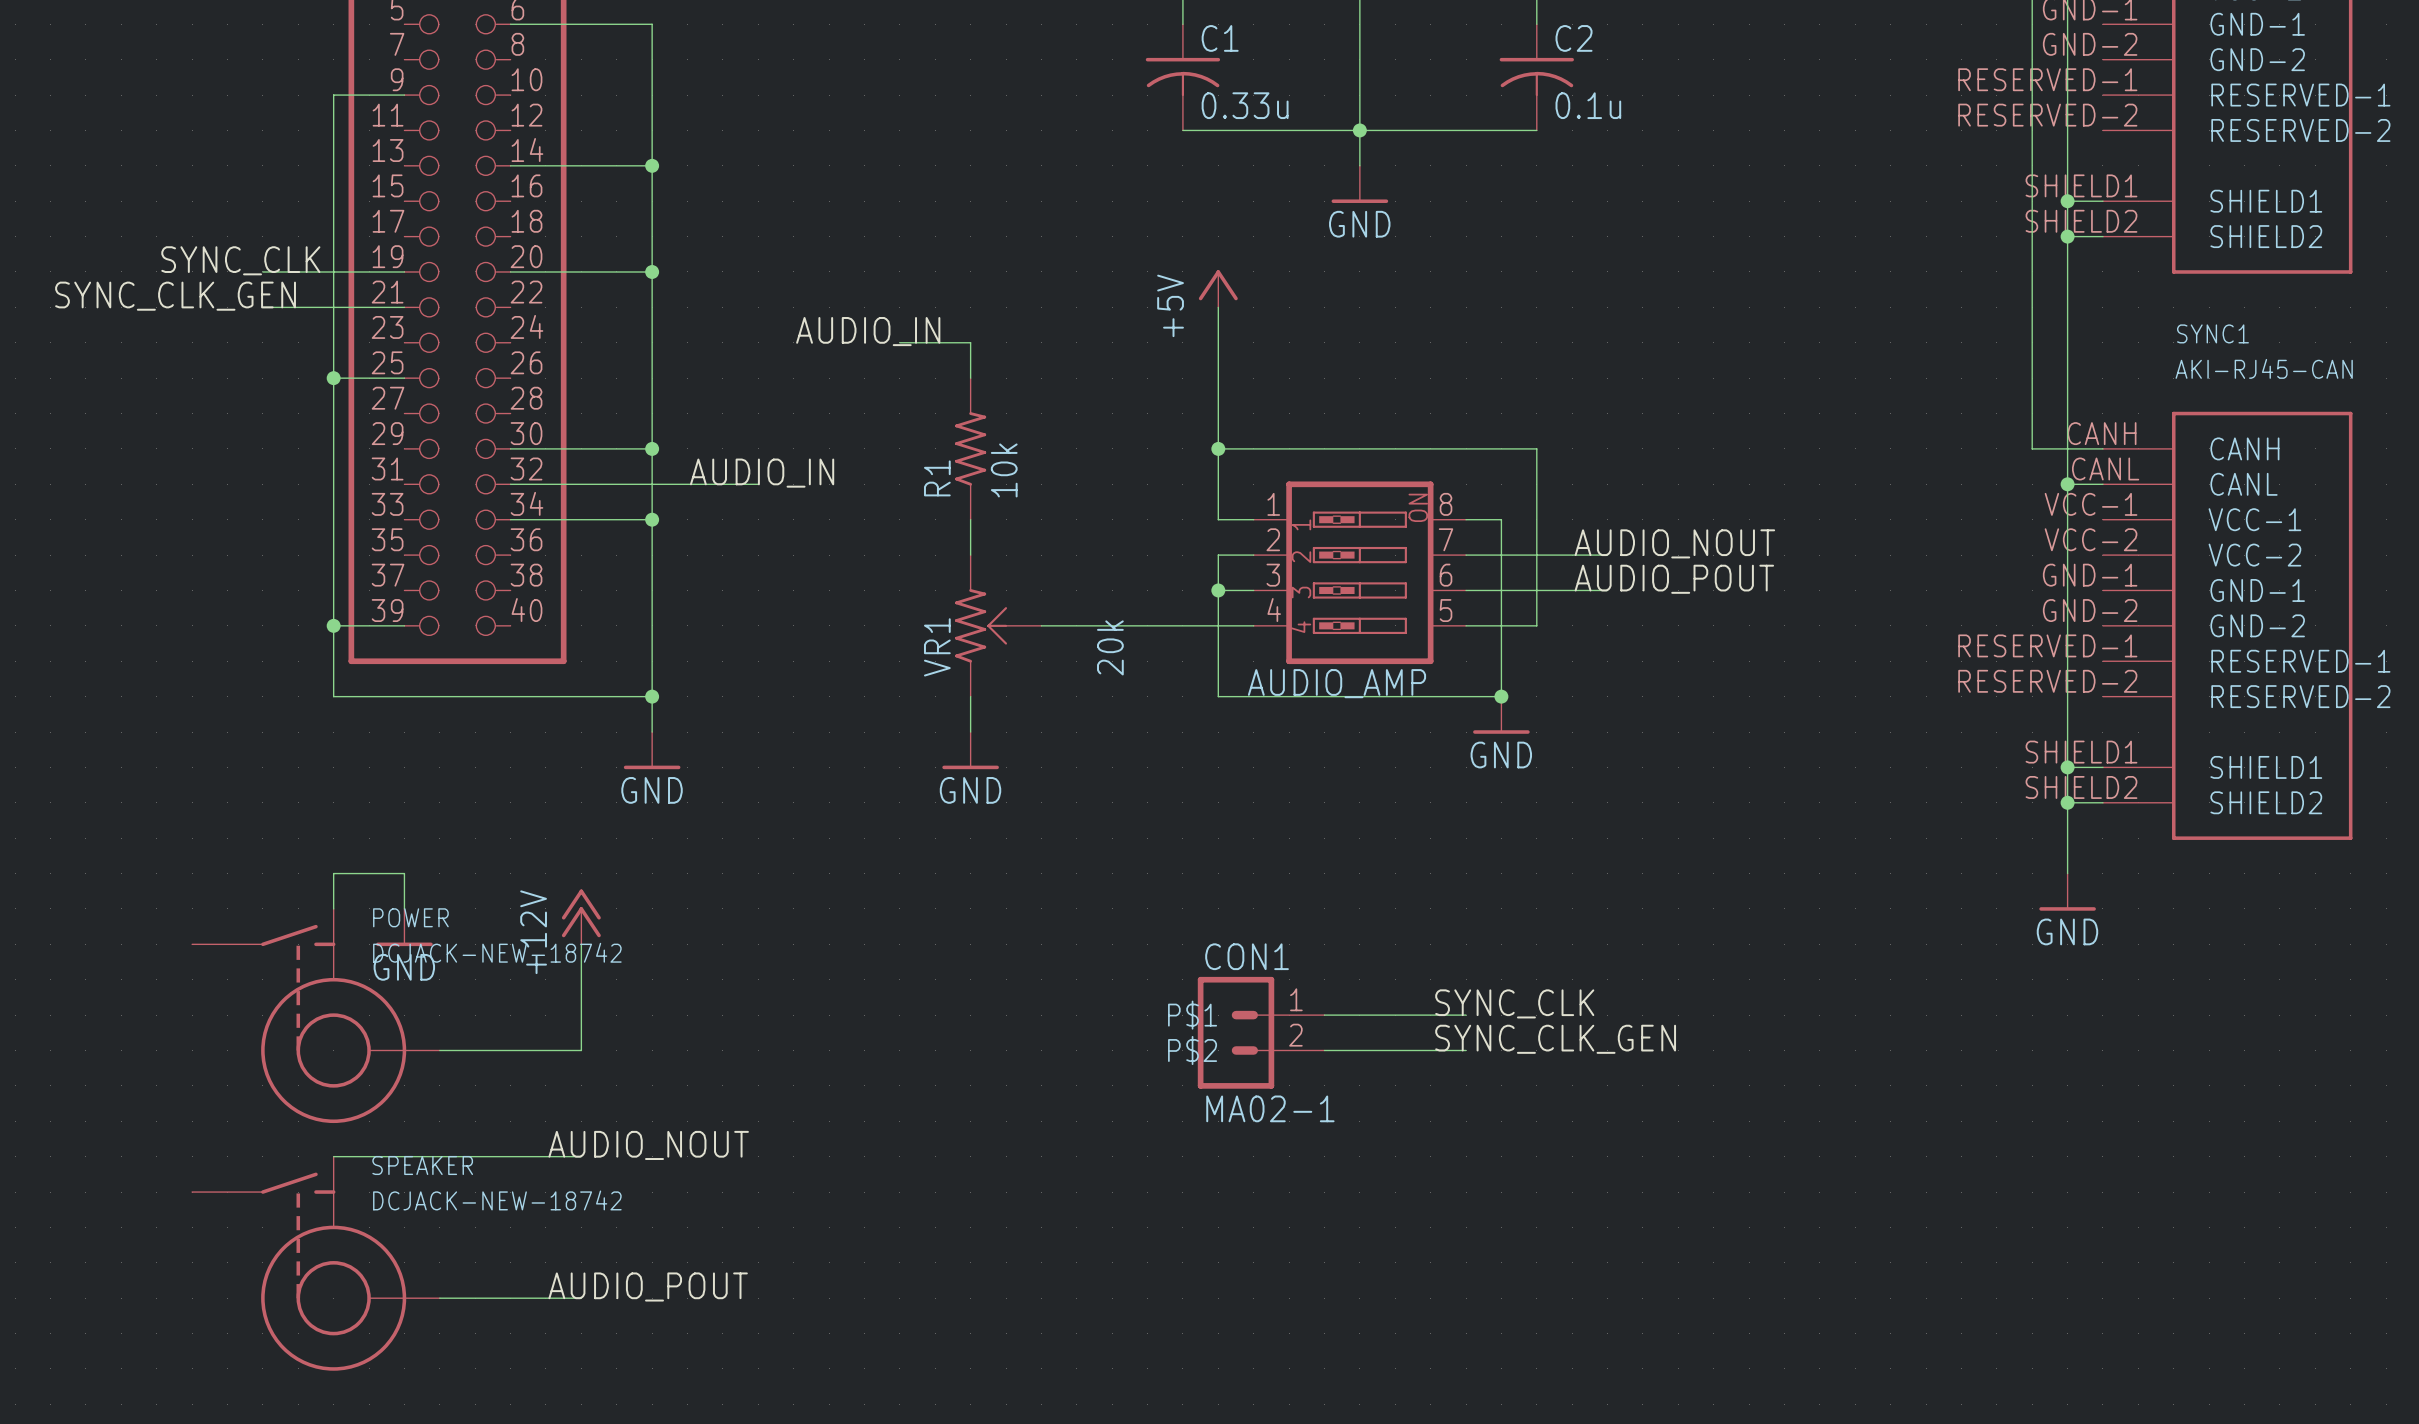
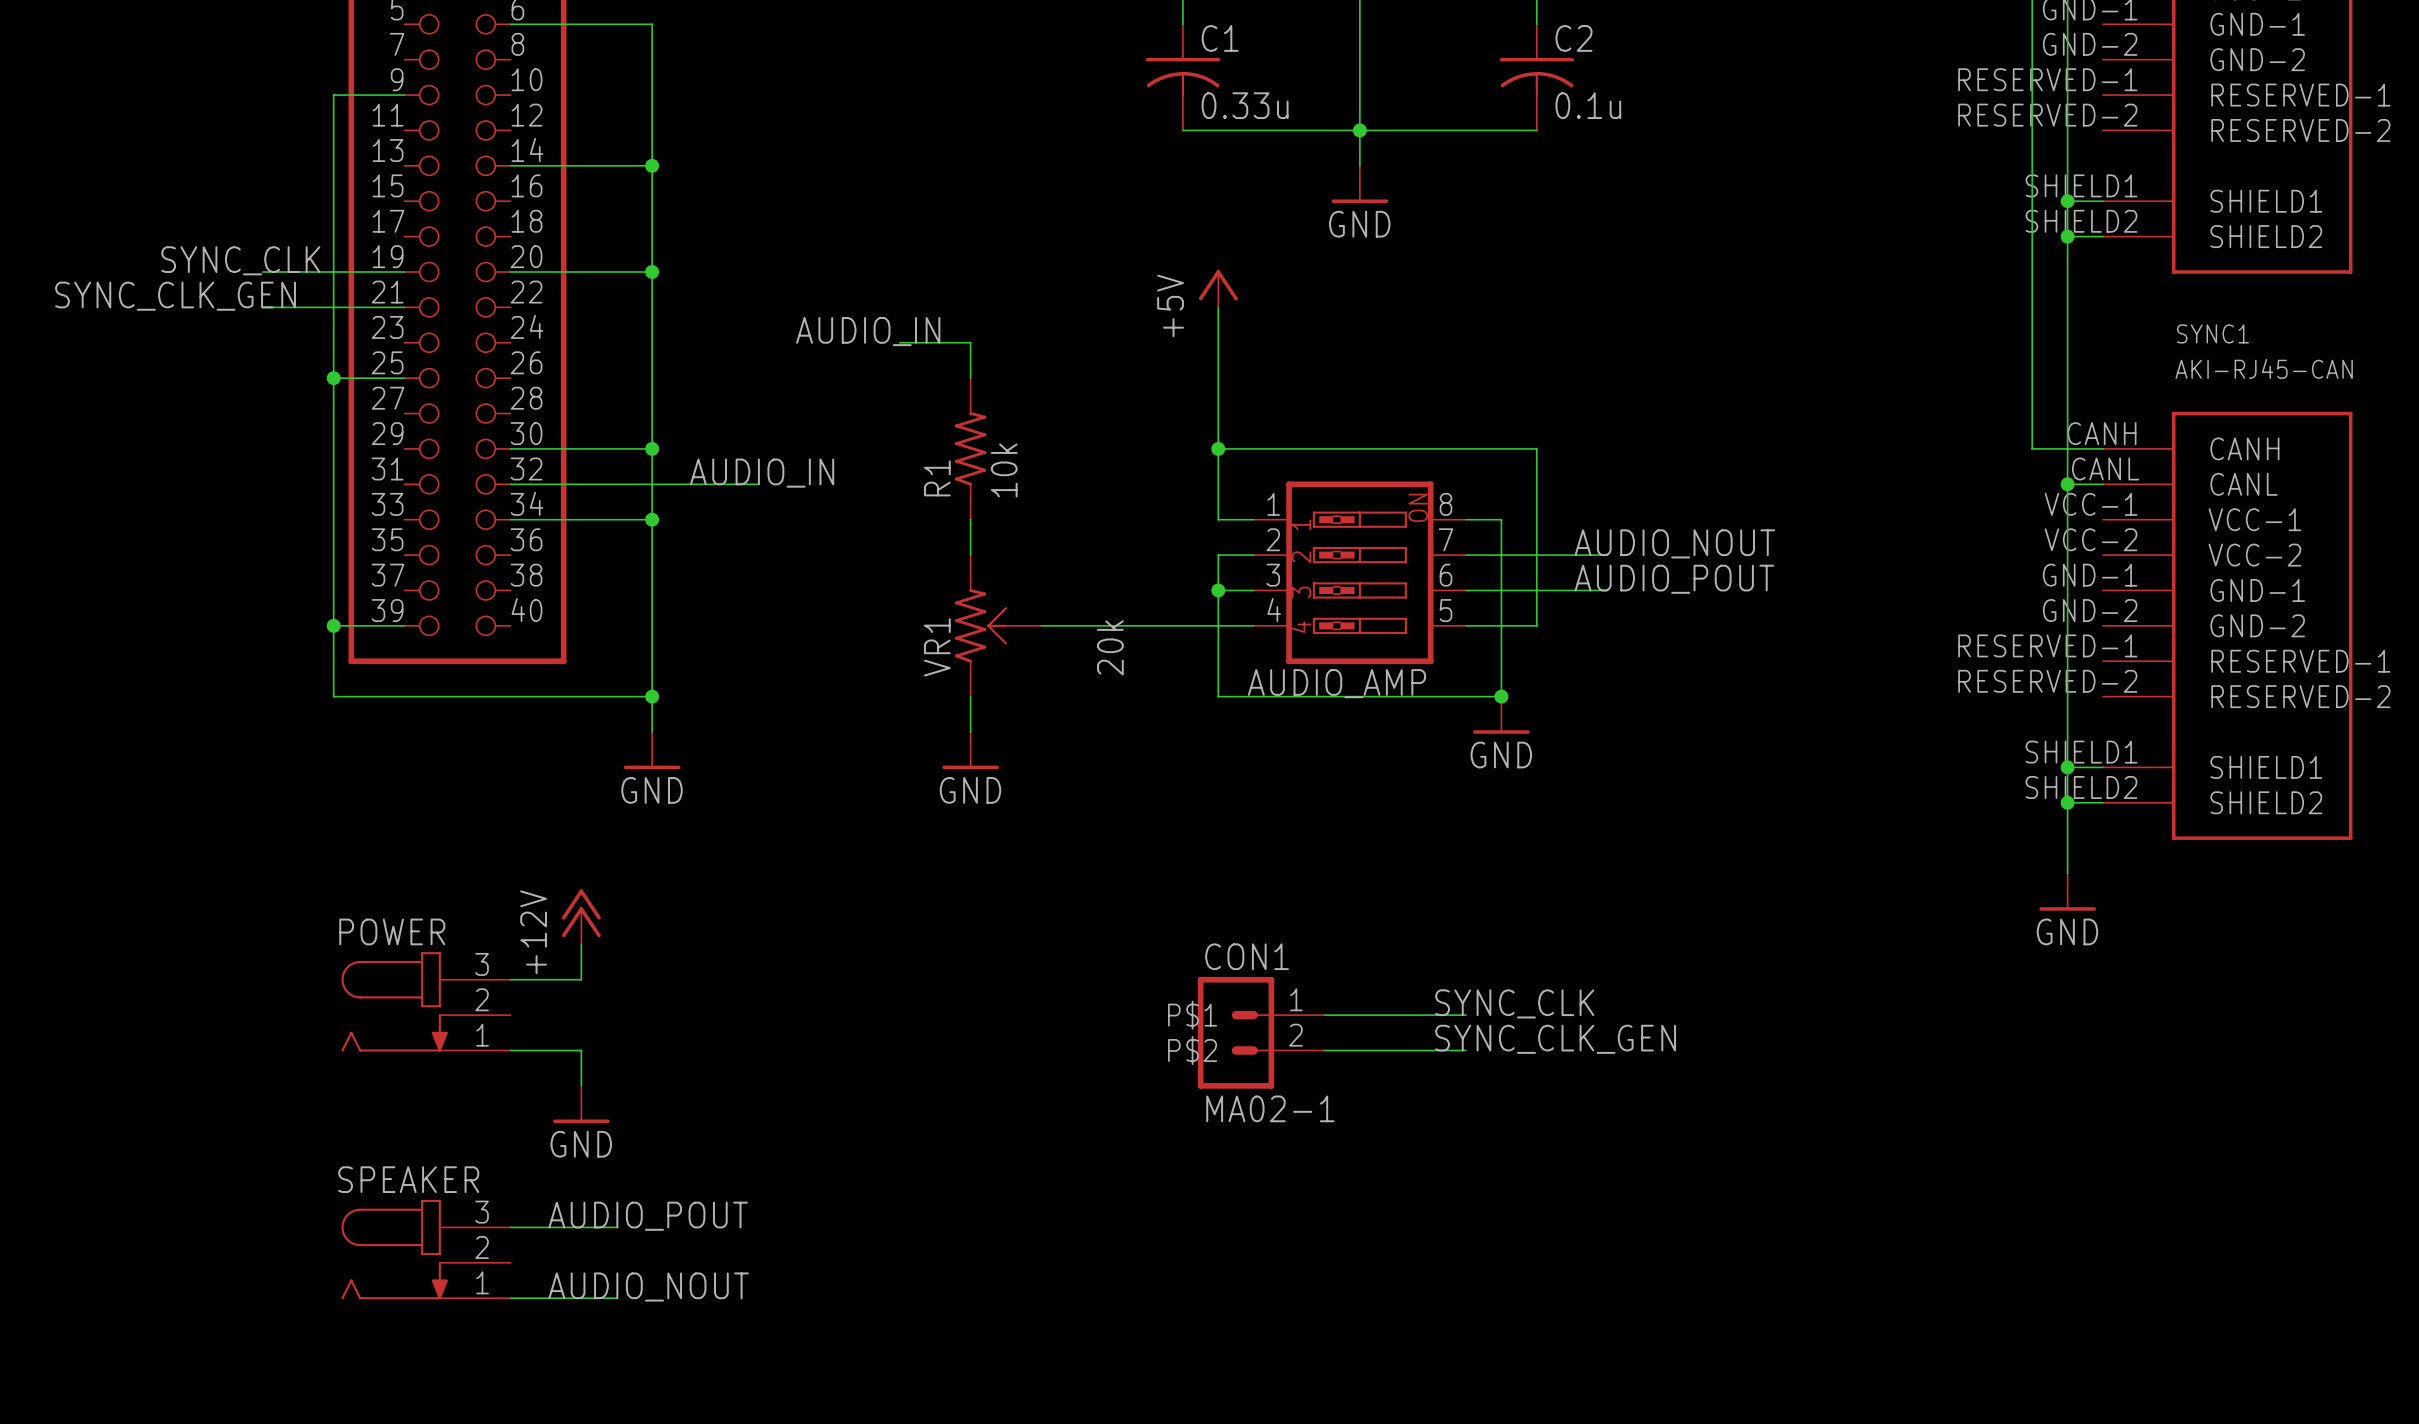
wire: (333, 908) (333, 873) (404, 873) (404, 908) -> none
power symbol position: GND (404, 927) -> GND (581, 1104)
wire: (581, 979) (581, 1050) -> (581, 979) (510, 979)
POWER: none -> (426, 1001)
POWER: DCJACK-NEW-18742 (315, 1015) -> none
wire: none -> (581, 1050) (581, 1085)
label: AUDIO_NOUT (648, 1145) -> none
wire: (333, 1156) (581, 1156) -> none
label: none -> AUDIO_POUT (648, 1216)
wire: none -> (510, 1227) (616, 1227)
SPEAKER: none -> (426, 1249)
SPEAKER: DCJACK-NEW-18742 (315, 1263) -> none
label: AUDIO_POUT (648, 1286) -> AUDIO_NOUT (648, 1286)
wire: none -> (581, 1298) (616, 1298)

